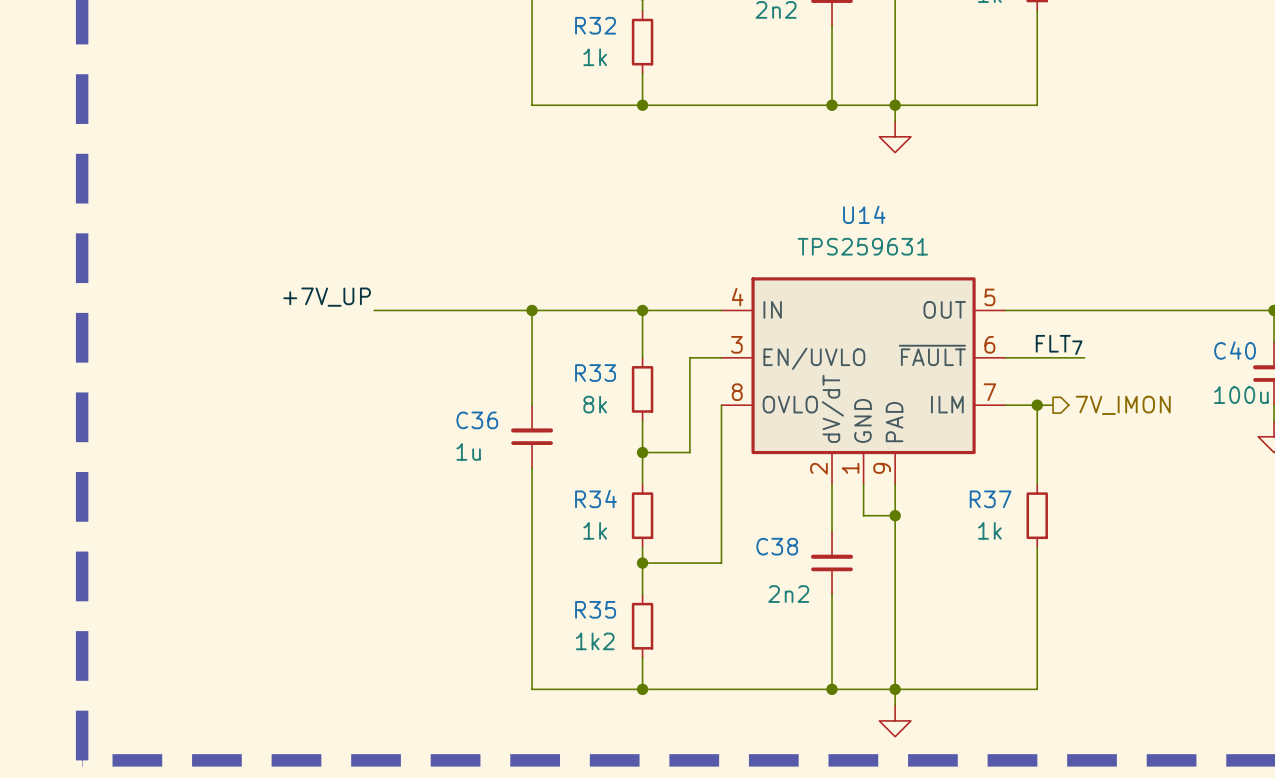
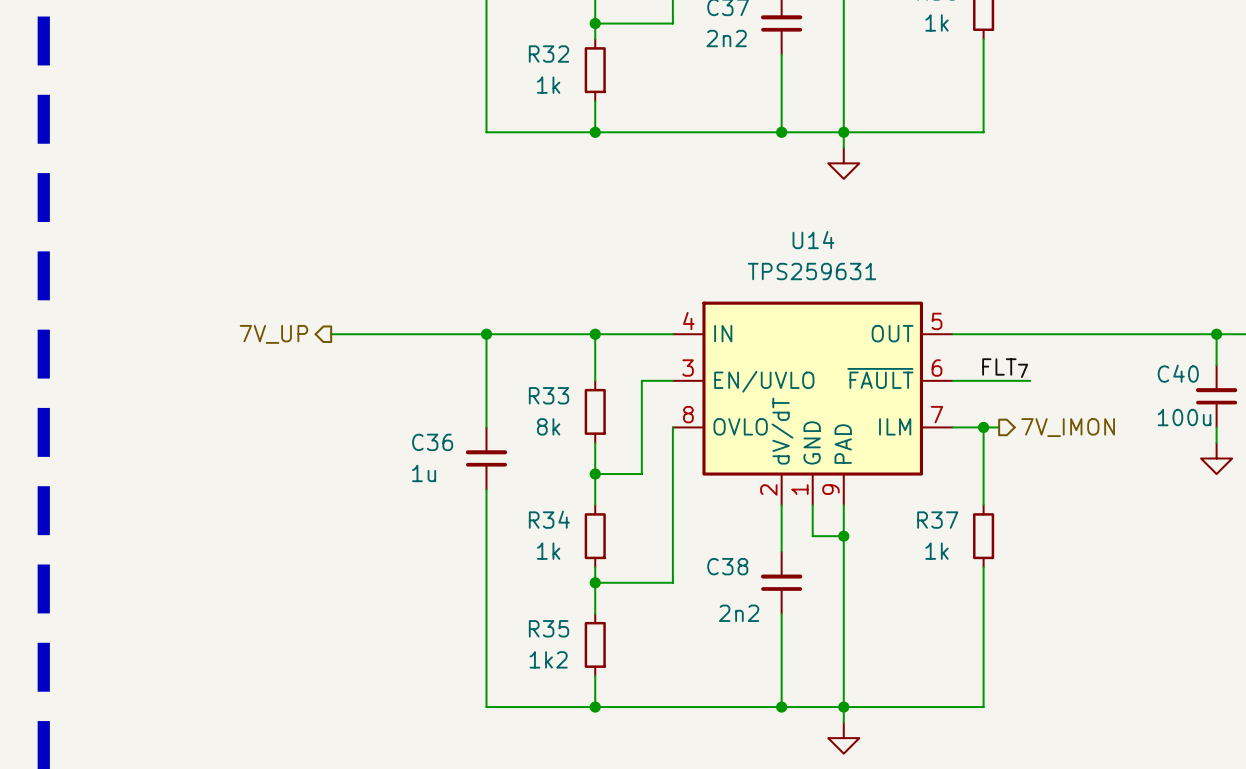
label: +7V_UP (327, 297) -> none
hierarchical label: none -> 7V_UP (273, 334)

